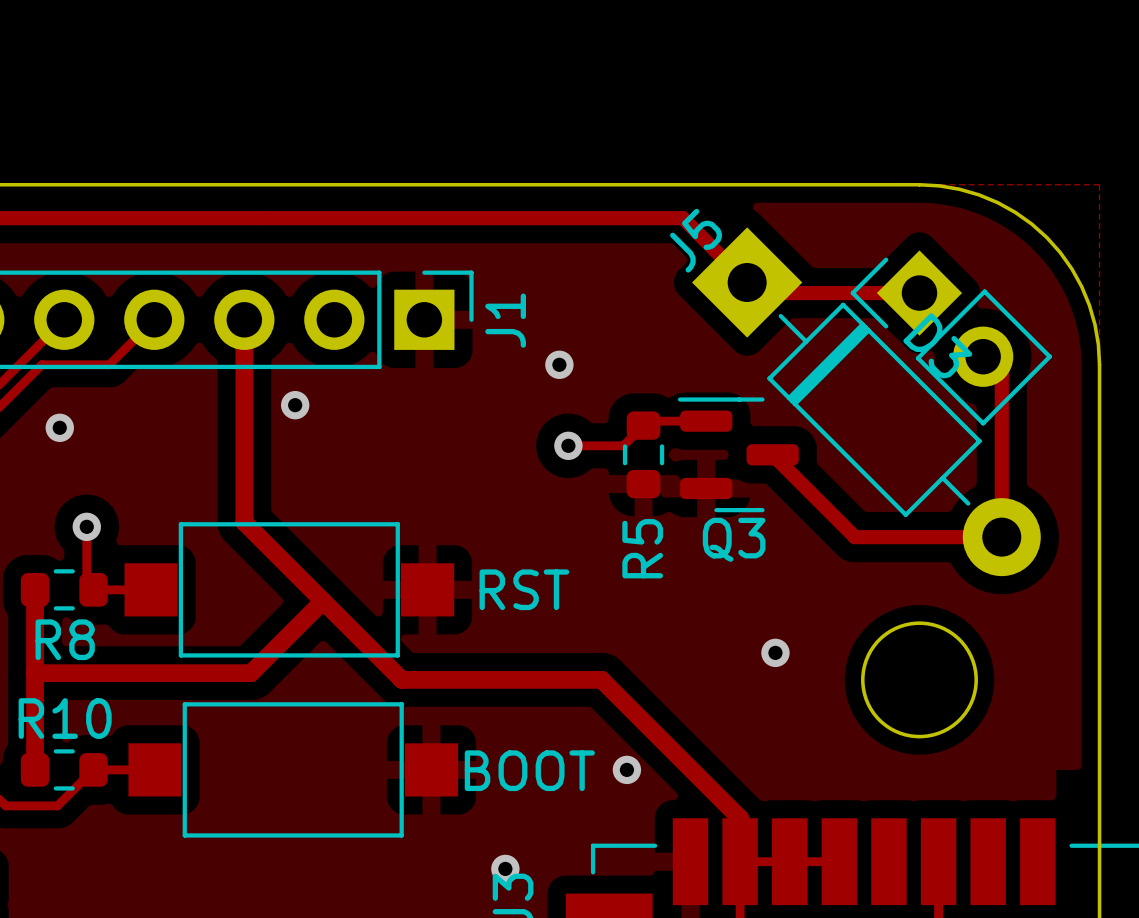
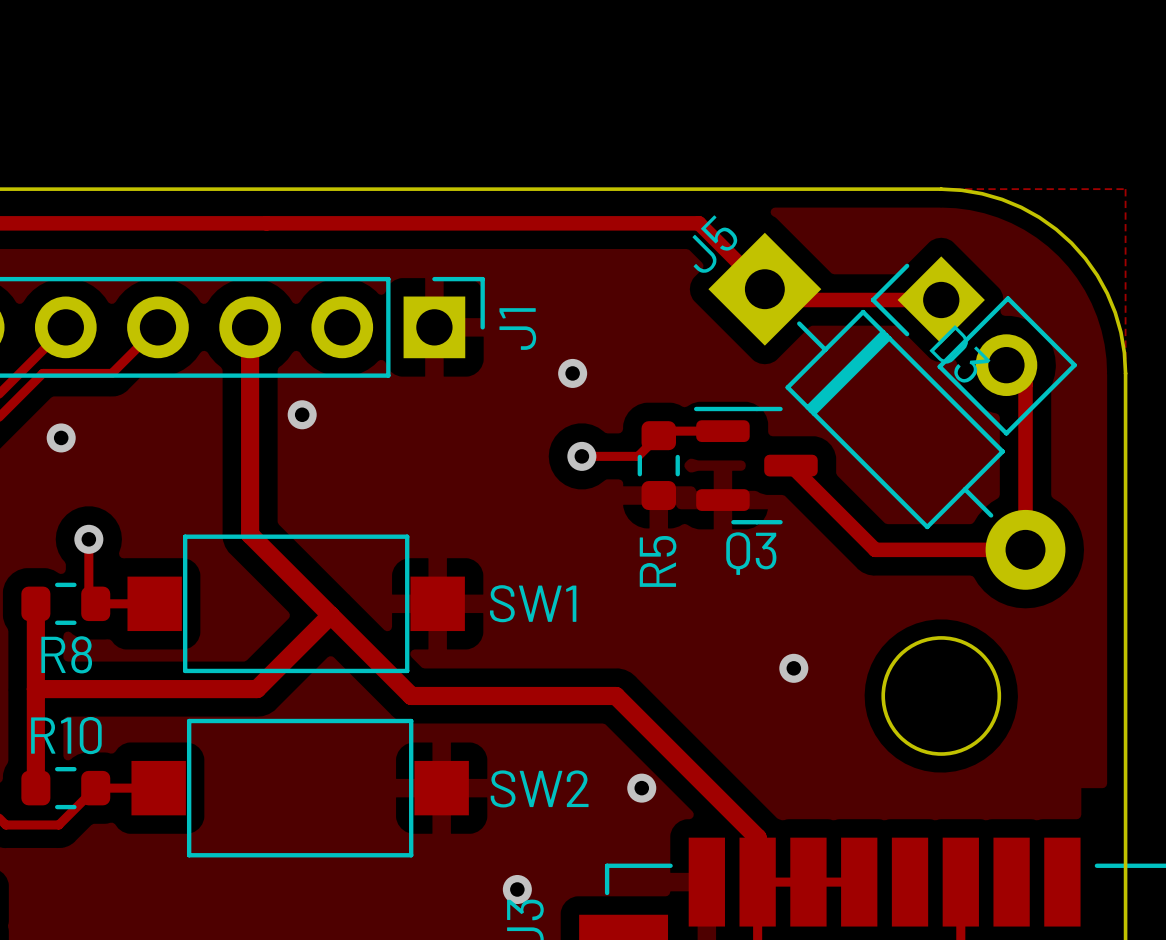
RST name: RST (524, 589) -> SW1 (533, 603)
BOOT name: BOOT (529, 770) -> SW2 (539, 788)

